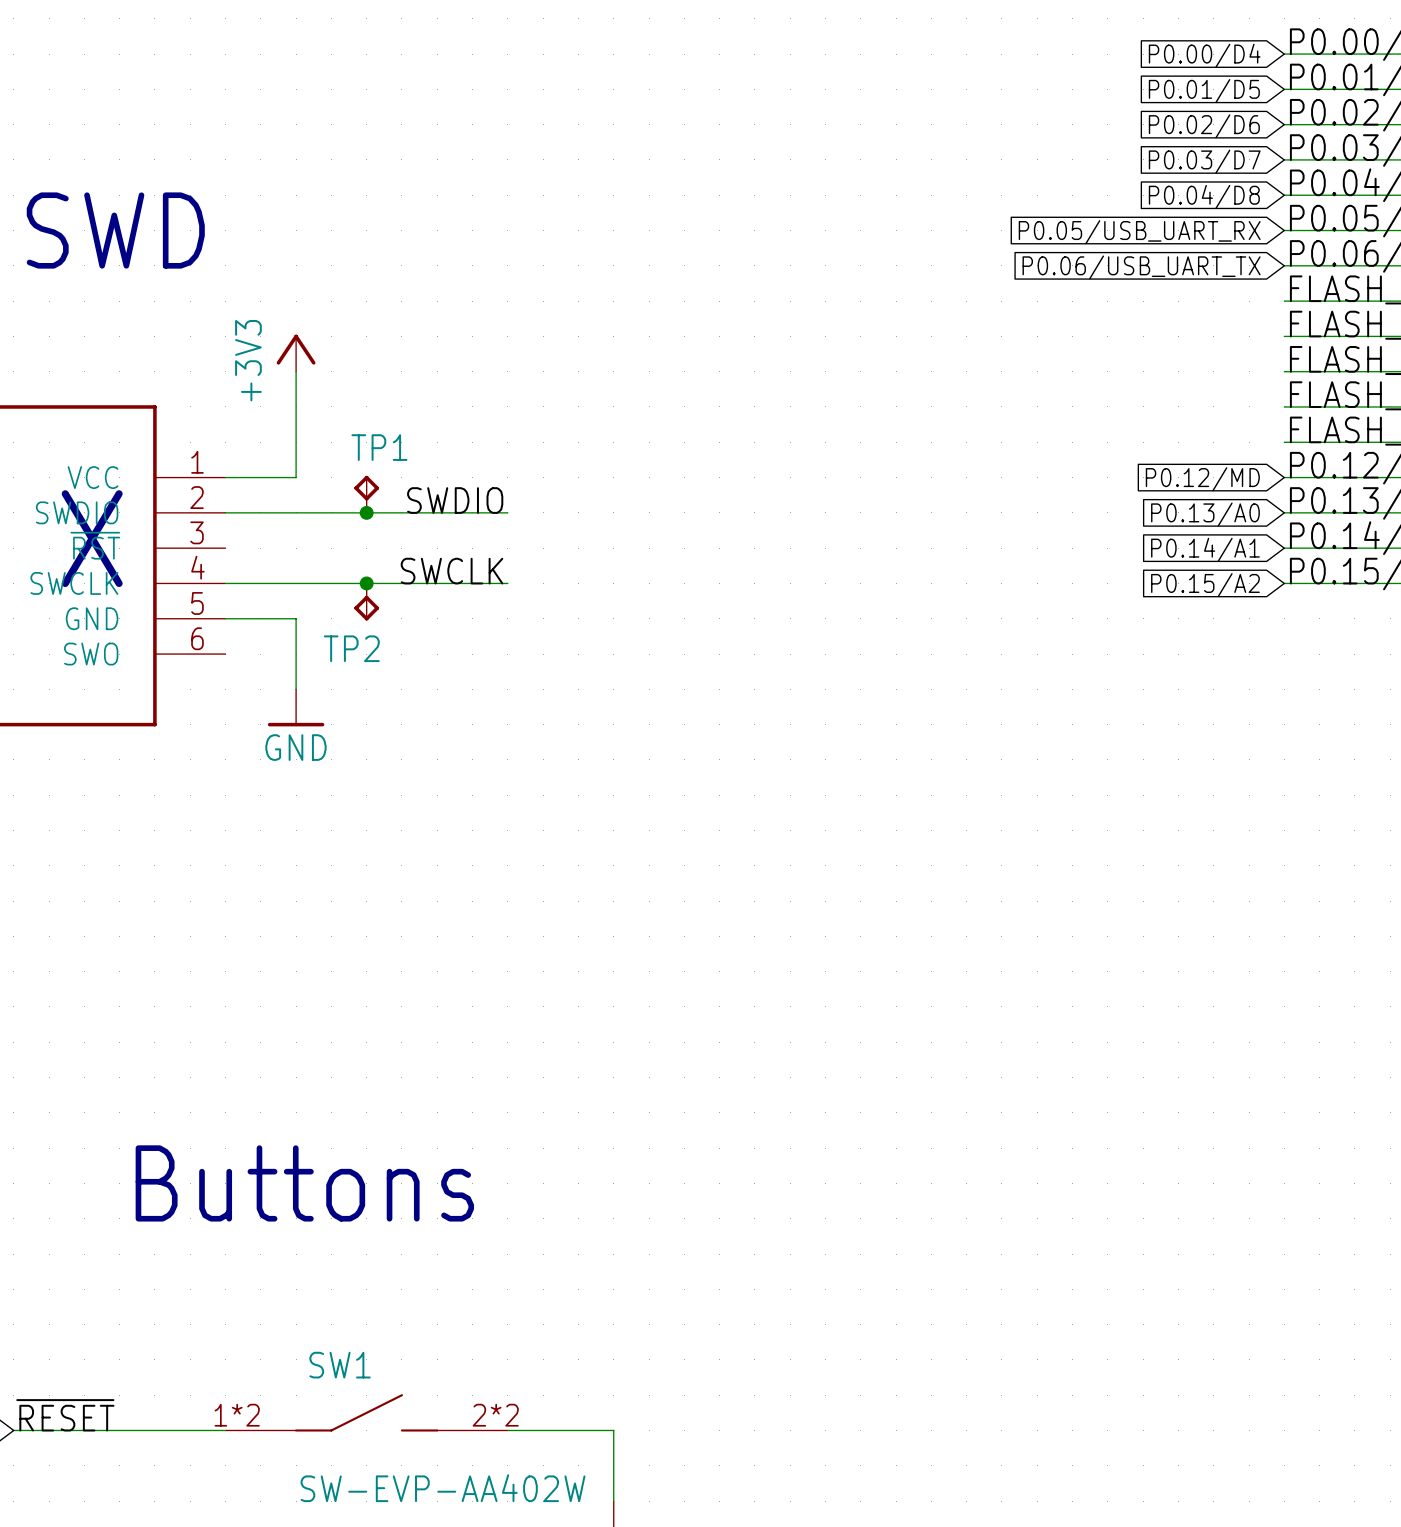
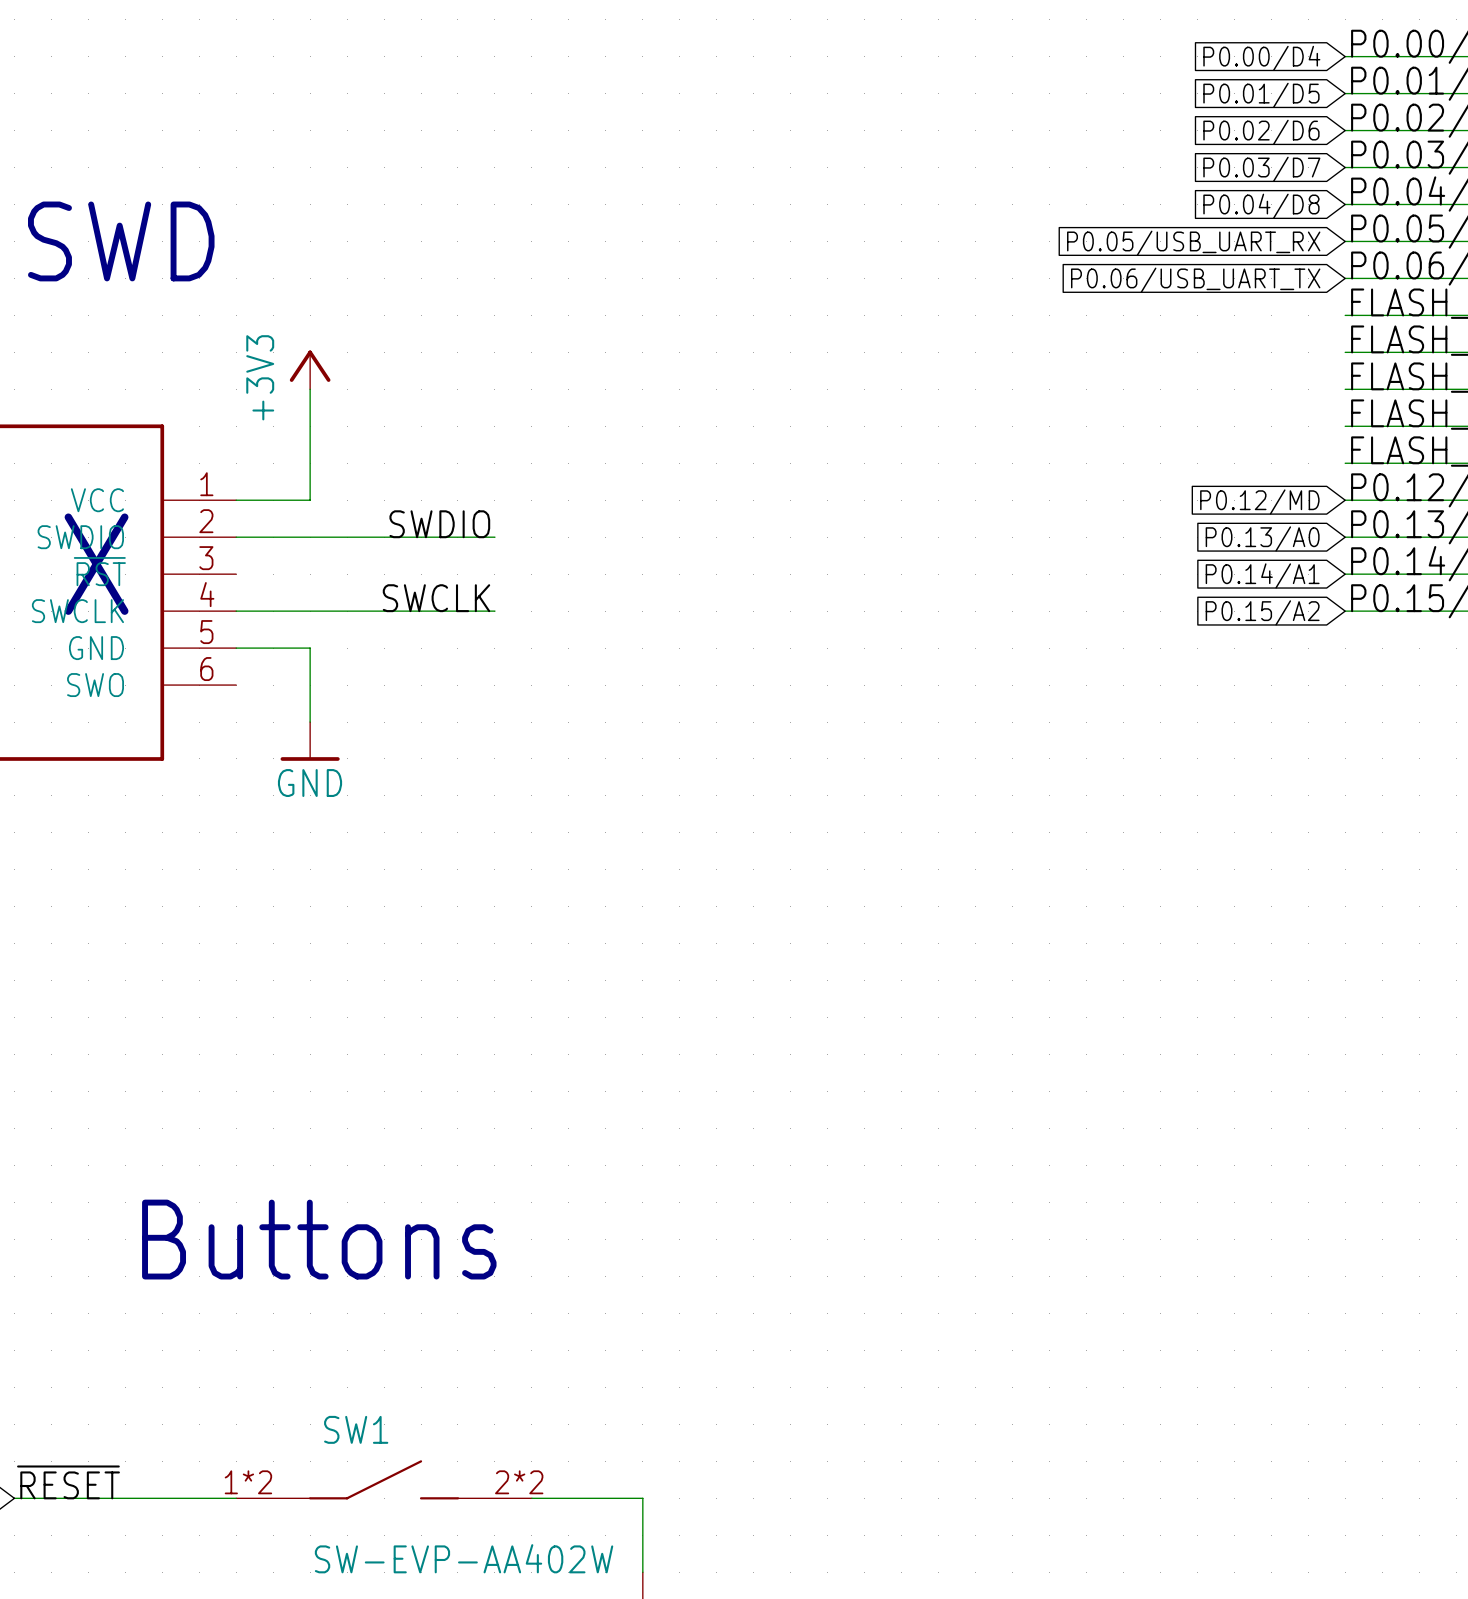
TP1: (366, 494) -> none
label position: SWDIO (455, 500) -> SWDIO (439, 524)
junction: (366, 512) -> none
wire: (472, 512) (507, 512) -> none
label position: SWCLK (452, 571) -> SWCLK (436, 598)
junction: (366, 583) -> none
wire: (472, 583) (507, 583) -> none
TP2: (366, 601) -> none

